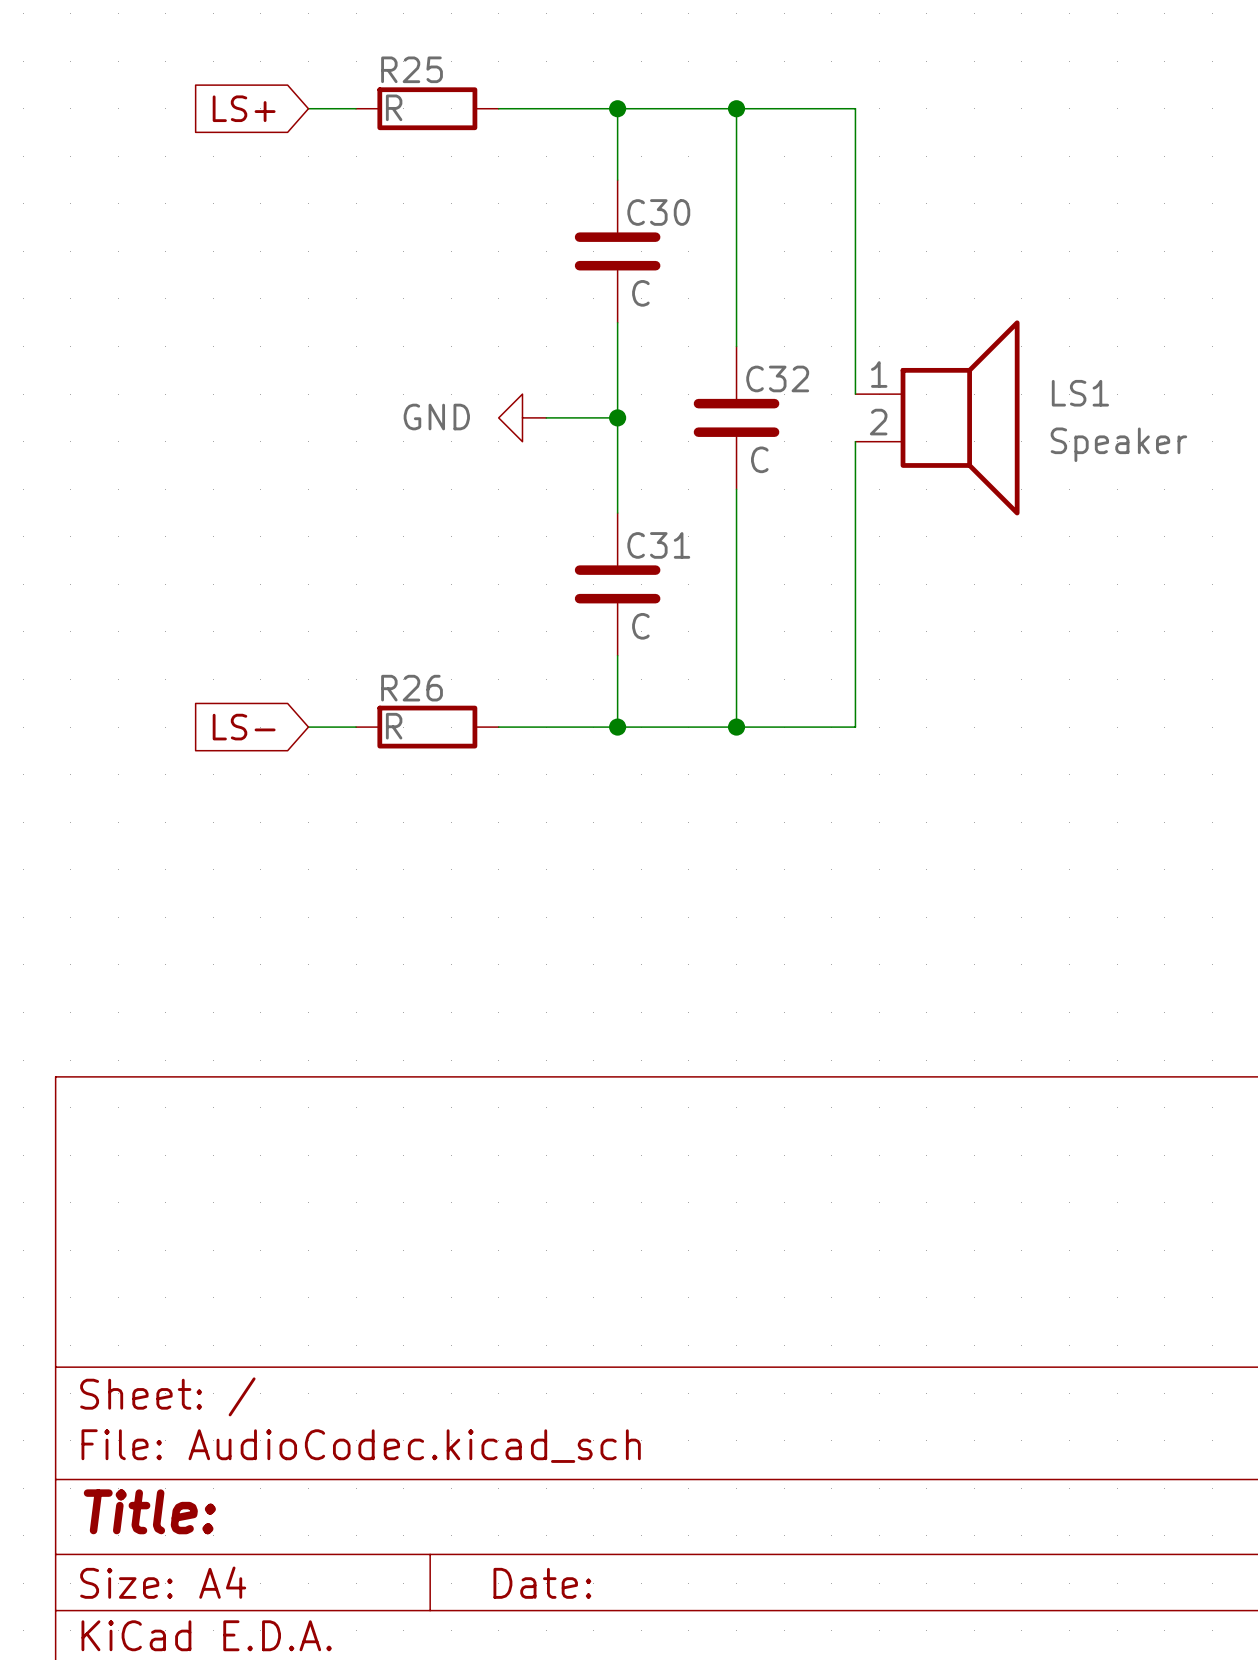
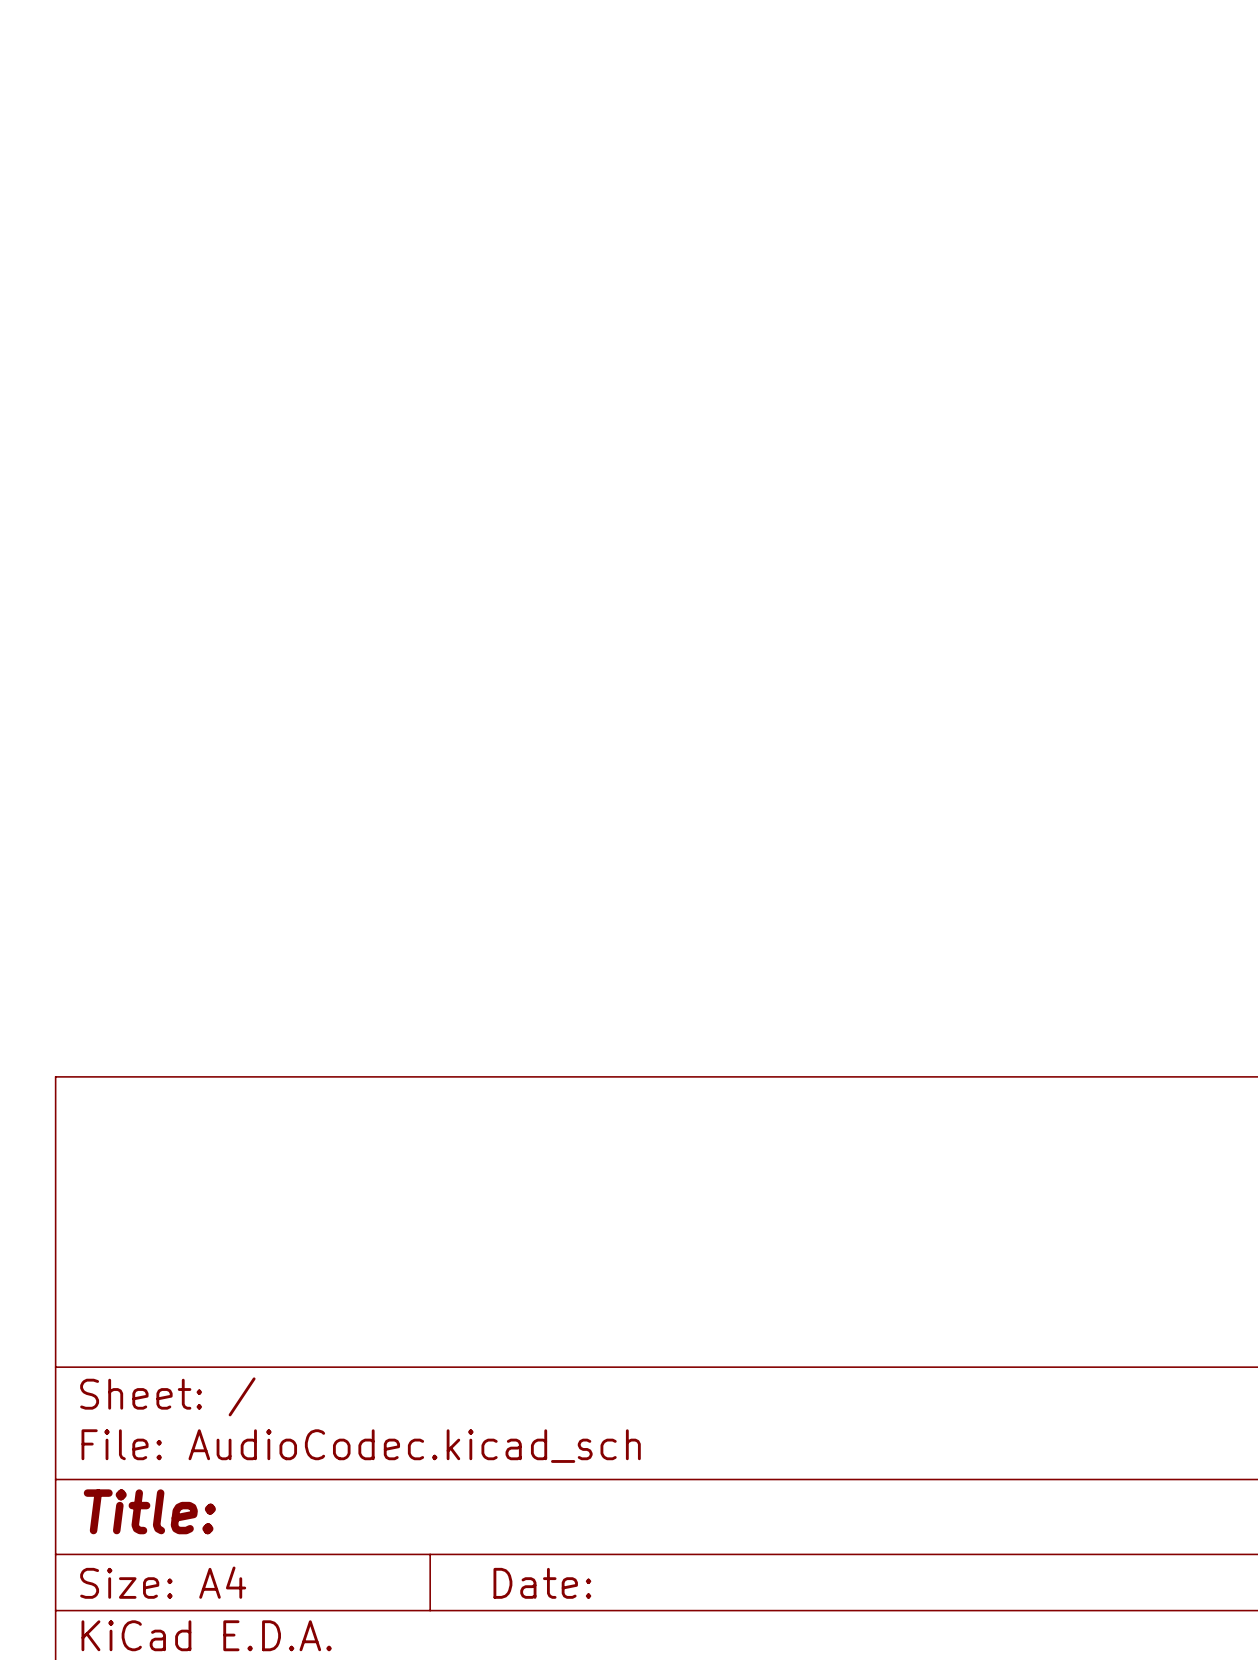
global label: LS+ (244, 108) -> none
wire: (308, 108) (356, 108) -> none
R25: R (427, 108) -> none
wire: (498, 108) (855, 108) (855, 394) -> none
wire: (617, 108) (617, 180) -> none
junction: (617, 108) -> none
wire: (736, 108) (736, 346) -> none
junction: (736, 108) -> none
C30: C (617, 251) -> none
wire: (617, 322) (617, 513) -> none
power symbol: GND (522, 417) -> none
wire: (546, 417) (617, 417) -> none
junction: (617, 417) -> none
C32: C (736, 417) -> none
LS1: Speaker (937, 417) -> none
wire: (855, 441) (855, 727) (498, 727) -> none
wire: (736, 489) (736, 727) -> none
C31: C (617, 584) -> none
wire: (617, 655) (617, 727) -> none
global label: LS- (244, 727) -> none
wire: (308, 727) (356, 727) -> none
R26: R (427, 727) -> none
junction: (617, 727) -> none
junction: (736, 727) -> none

